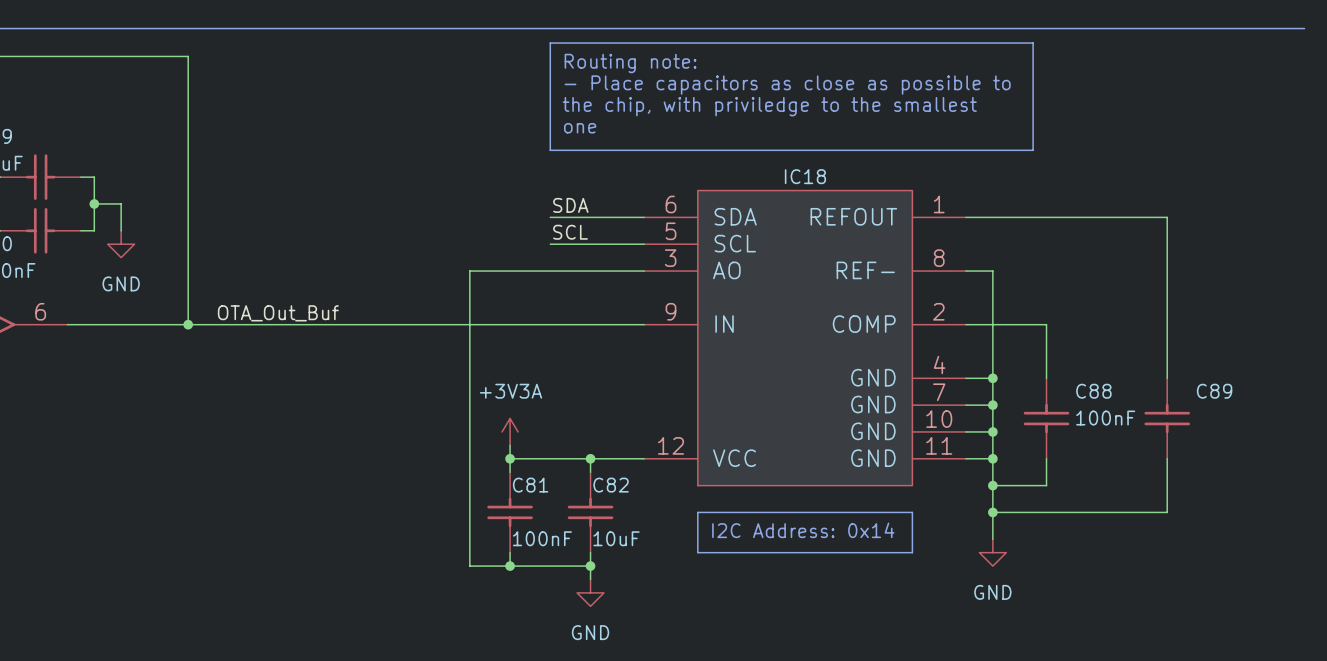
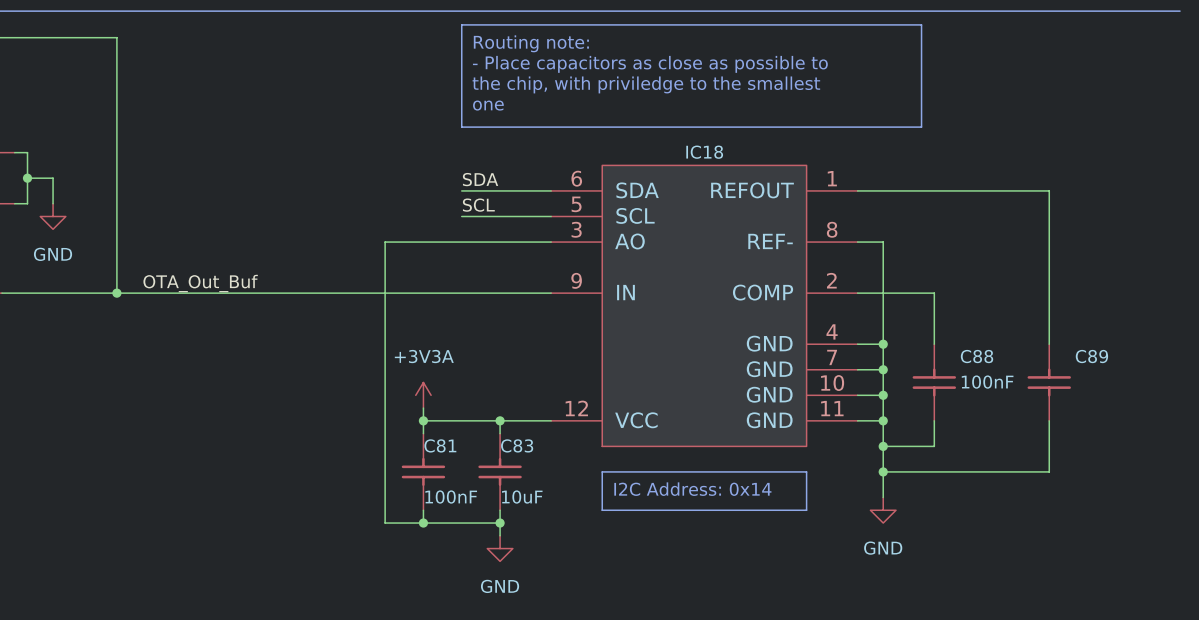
C82 name: C82 (611, 485) -> C83 (517, 445)

